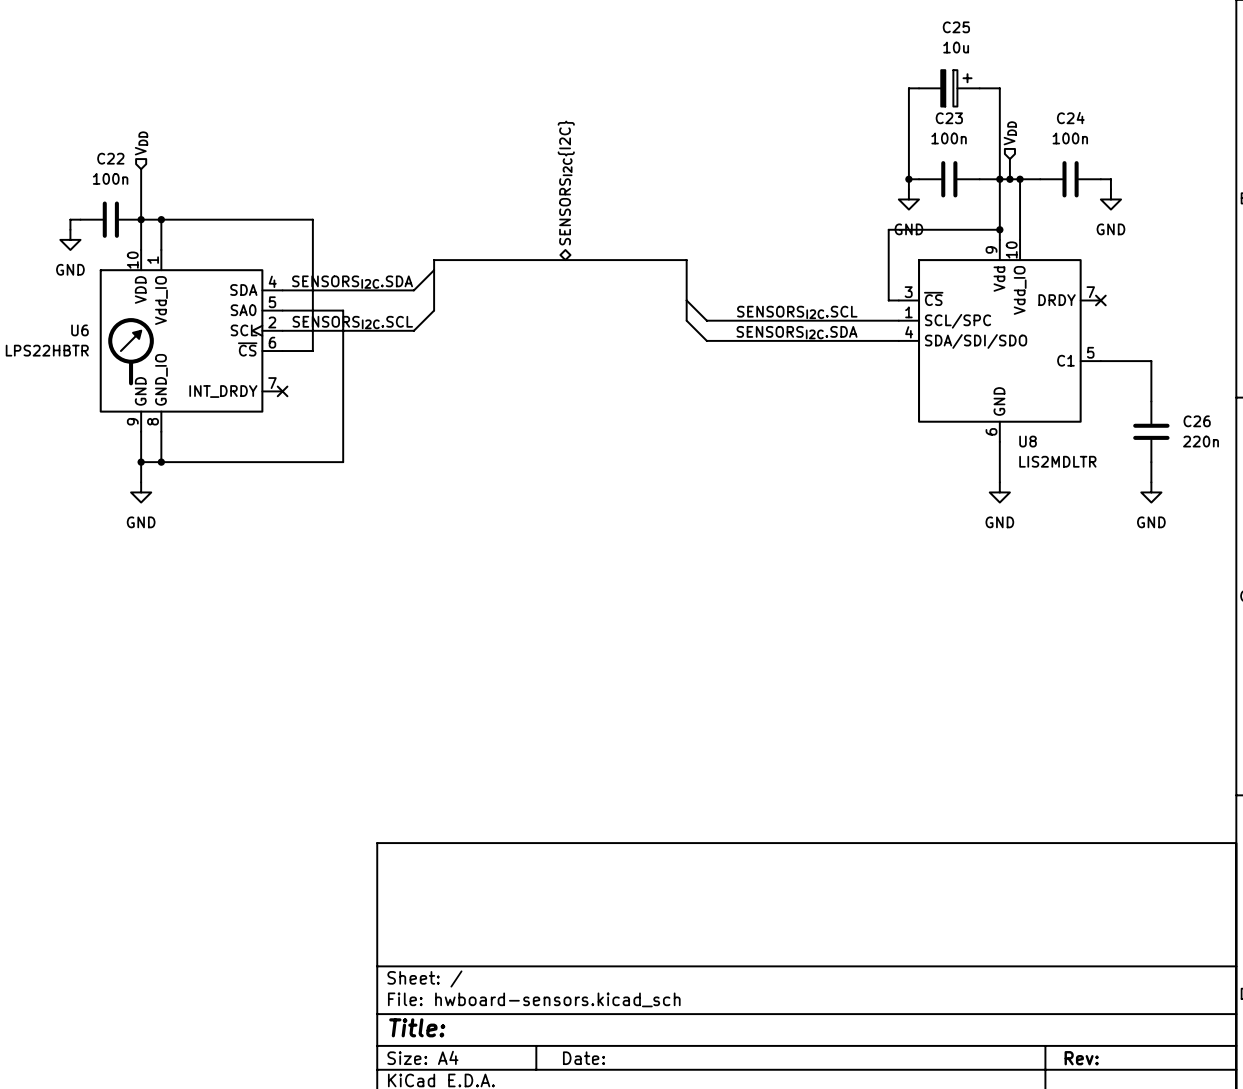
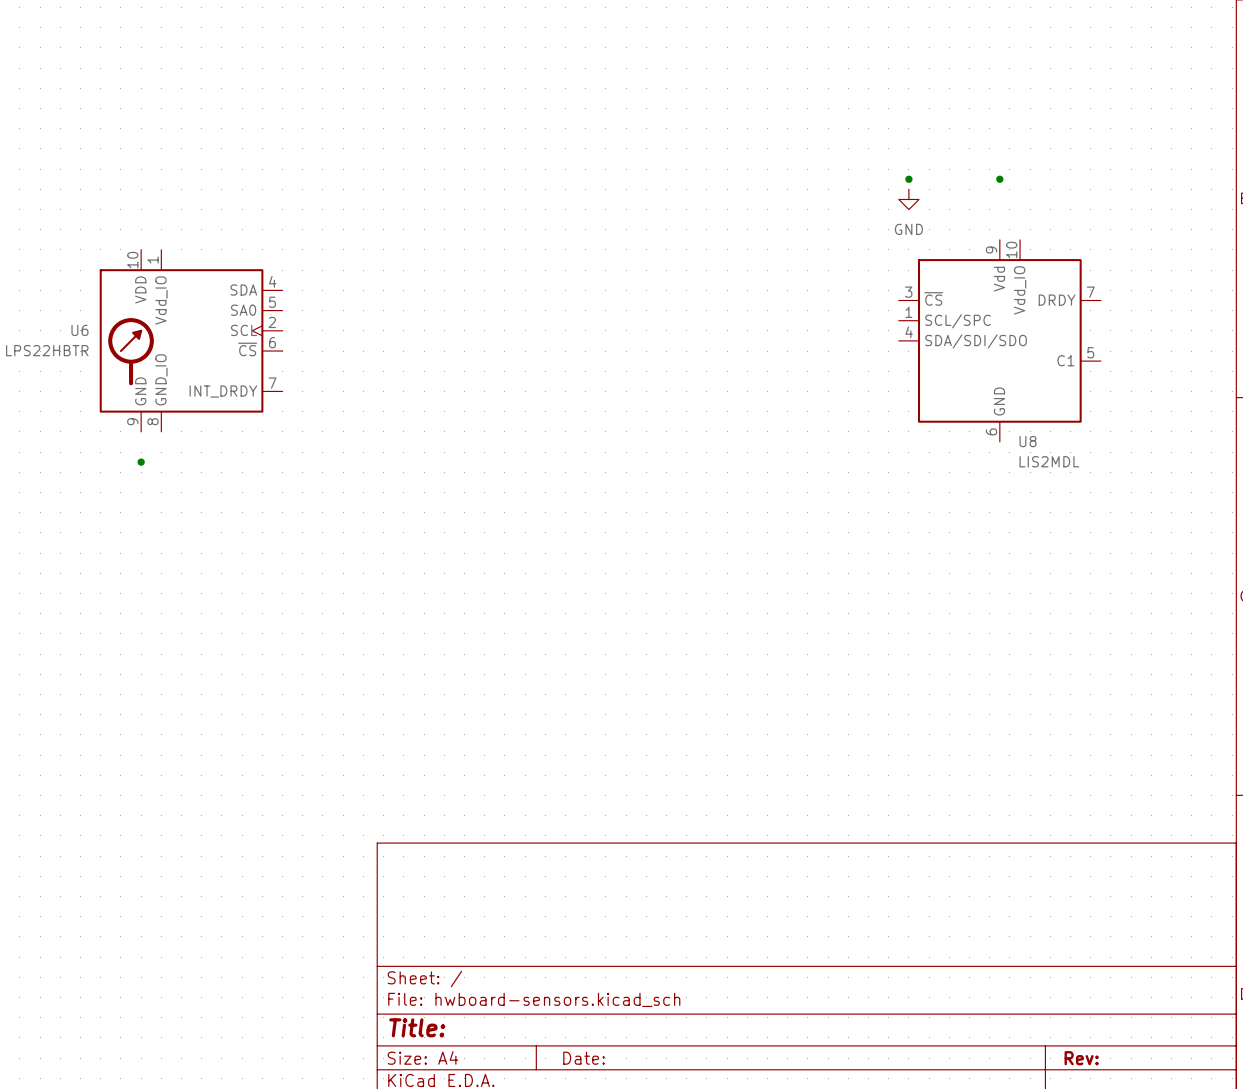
wire: (919, 88) (908, 88) (908, 189) -> none
C25: 10u (949, 88) -> none
wire: (979, 88) (999, 88) (999, 239) -> none
hierarchical label: VDD (1010, 133) -> none
hierarchical label: VDD (141, 143) -> none
wire: (1009, 159) (1009, 179) -> none
wire: (141, 169) (141, 249) -> none
wire: (908, 179) (919, 179) -> none
C23: 100n (949, 179) -> none
wire: (979, 179) (1040, 179) -> none
junction: (1009, 179) -> none
wire: (1020, 179) (1020, 239) -> none
junction: (1020, 179) -> none
C24: 100n (1070, 179) -> none
wire: (1100, 179) (1110, 179) (1110, 189) -> none
hierarchical label: SENSORSI2C{I2C} (566, 183) -> none
power symbol: GND (1110, 199) -> none
wire: (80, 219) (70, 219) (70, 229) -> none
C22: 100n (110, 219) -> none
wire: (141, 219) (312, 219) (312, 351) (282, 351) -> none
junction: (141, 219) -> none
wire: (161, 219) (161, 249) -> none
junction: (161, 219) -> none
wire: (999, 229) (888, 229) (888, 300) (898, 300) -> none
junction: (999, 229) -> none
power symbol: GND (70, 239) -> none
wire: (434, 270) (413, 290) (282, 290) -> none
label: SENSORSI2C.SDA (352, 282) -> none
wire: (686, 300) (706, 320) (898, 320) -> none
no-connect mark: (1100, 300) -> none
wire: (282, 310) (343, 310) (343, 462) (141, 462) -> none
wire: (434, 310) (413, 330) (282, 330) -> none
bus: (434, 310) (434, 260) (686, 260) (686, 320) -> none
label: SENSORSI2C.SCL (797, 312) -> none
wire: (686, 320) (706, 340) (898, 340) -> none
label: SENSORSI2C.SCL (352, 322) -> none
label: SENSORSI2C.SDA (797, 332) -> none
wire: (1100, 361) (1151, 361) (1151, 401) -> none
no-connect mark: (282, 391) -> none
wire: (141, 431) (141, 482) -> none
wire: (161, 431) (161, 462) -> none
C26: 220n (1151, 431) -> none
wire: (999, 441) (999, 482) -> none
U8 value: LIS2MDLTR (1057, 461) -> LIS2MDL (1049, 461)
junction: (161, 462) -> none
wire: (1151, 462) (1151, 482) -> none
power symbol: GND (141, 492) -> none
power symbol: GND (999, 492) -> none
power symbol: GND (1151, 492) -> none

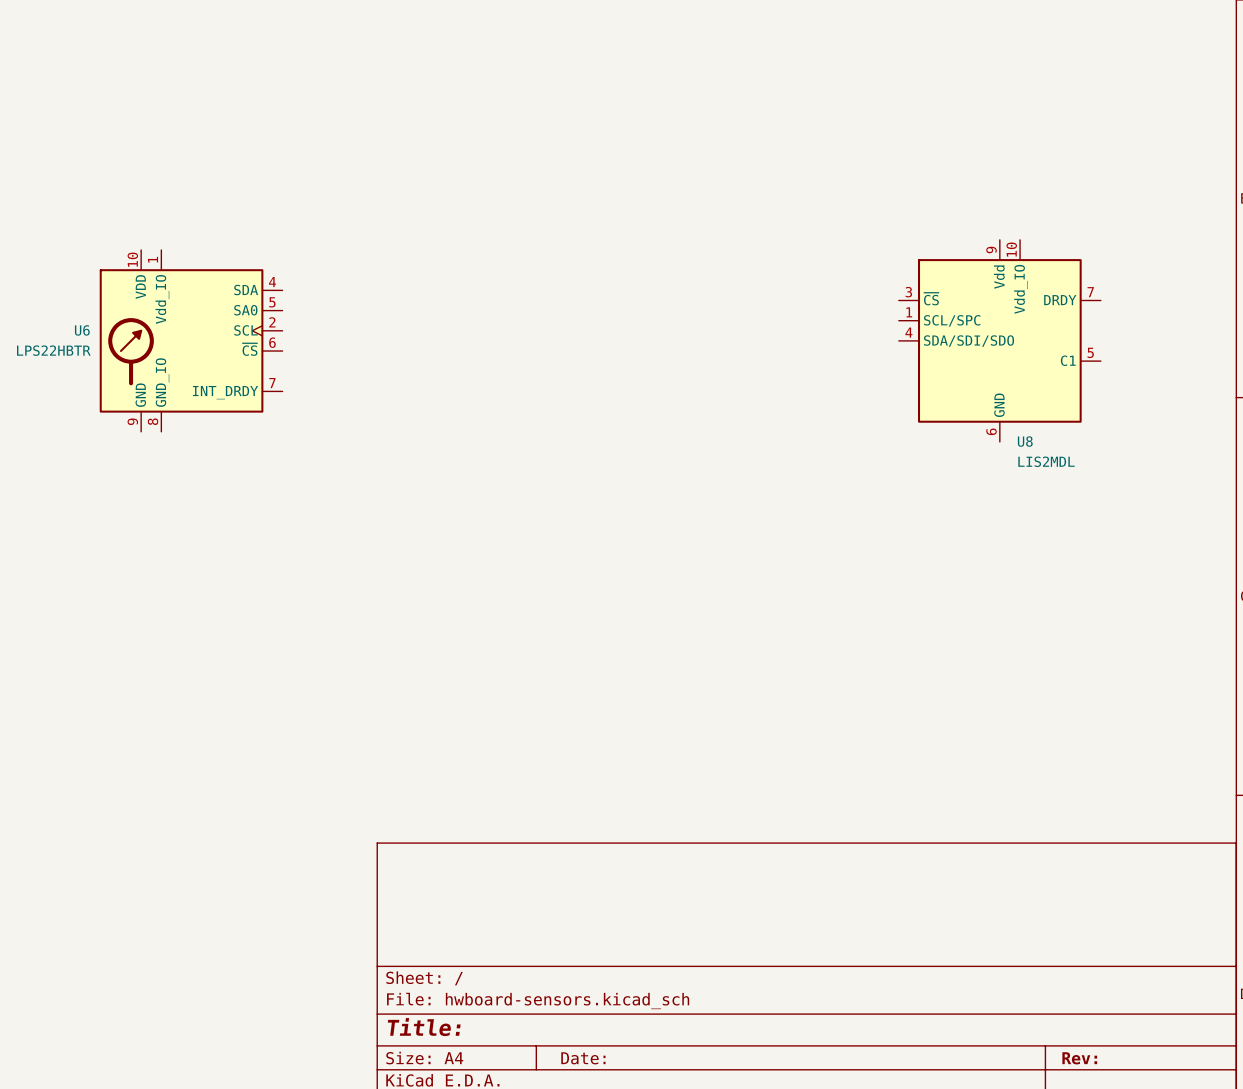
junction: (908, 179) -> none
junction: (999, 179) -> none
power symbol: GND (908, 199) -> none
junction: (141, 462) -> none

